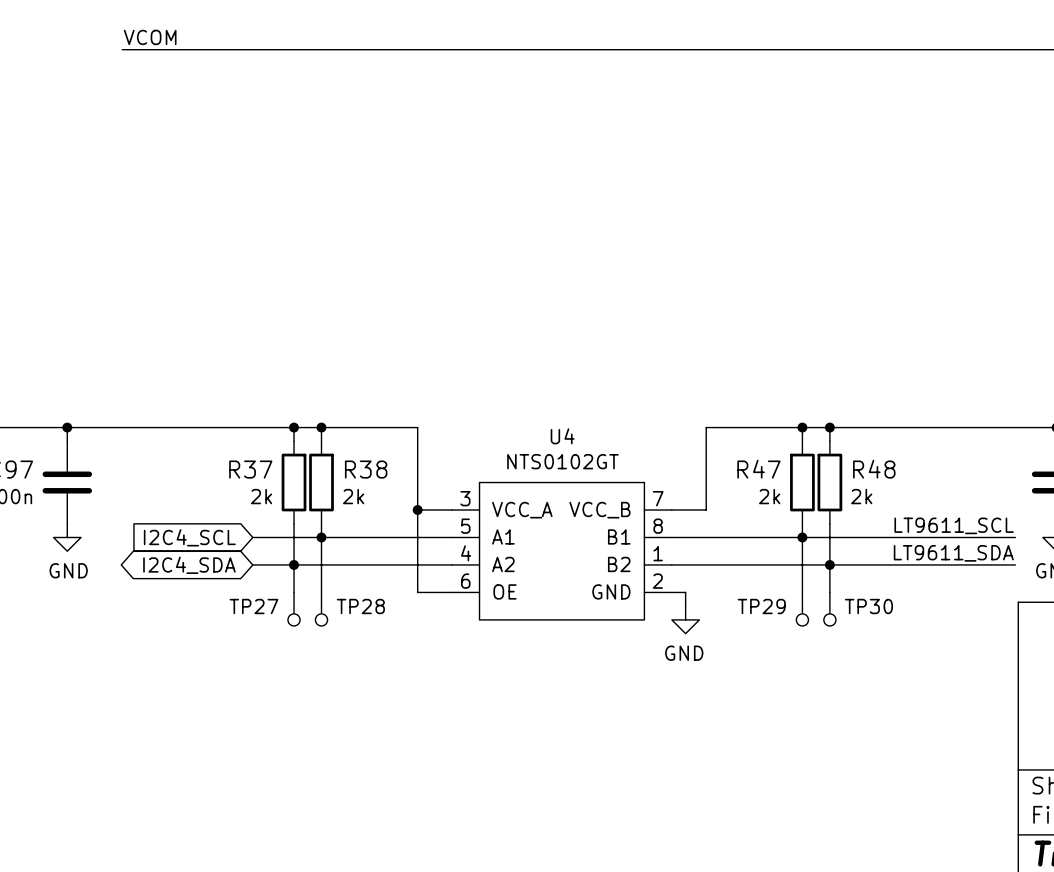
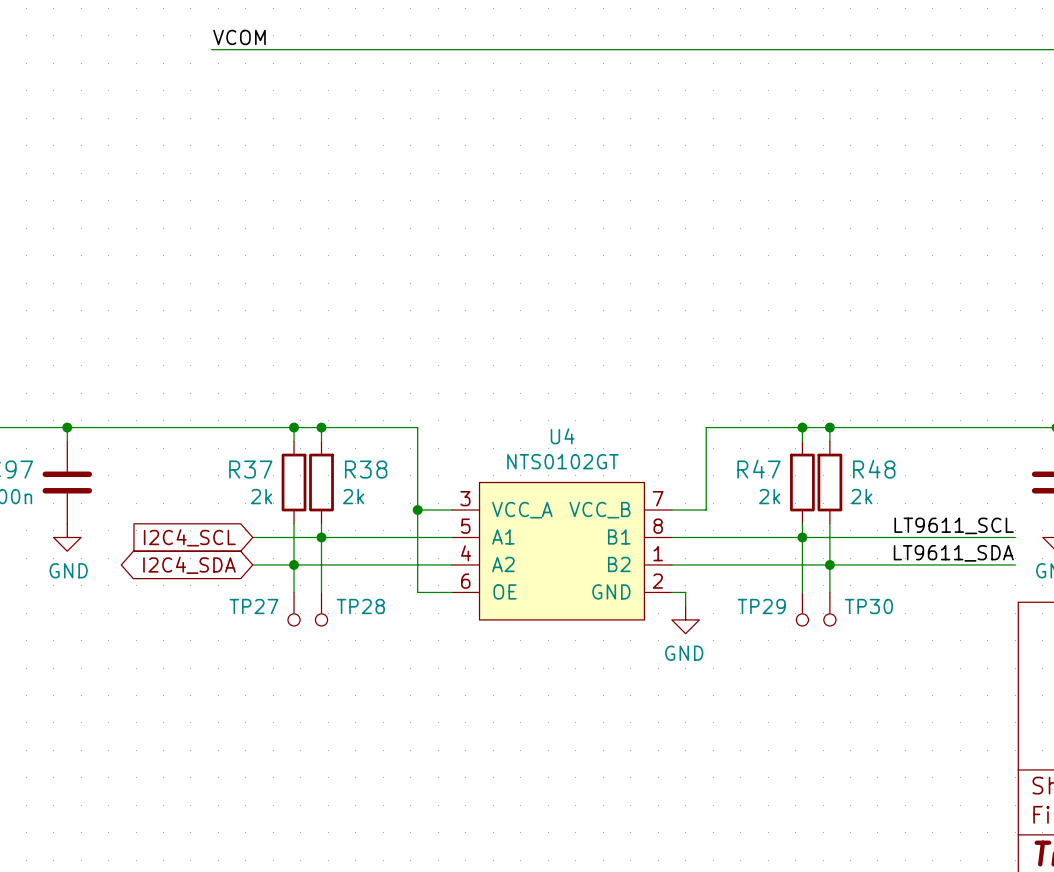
label position: VCOM (150, 37) -> VCOM (239, 37)
wire: (122, 49) (211, 49) -> none

